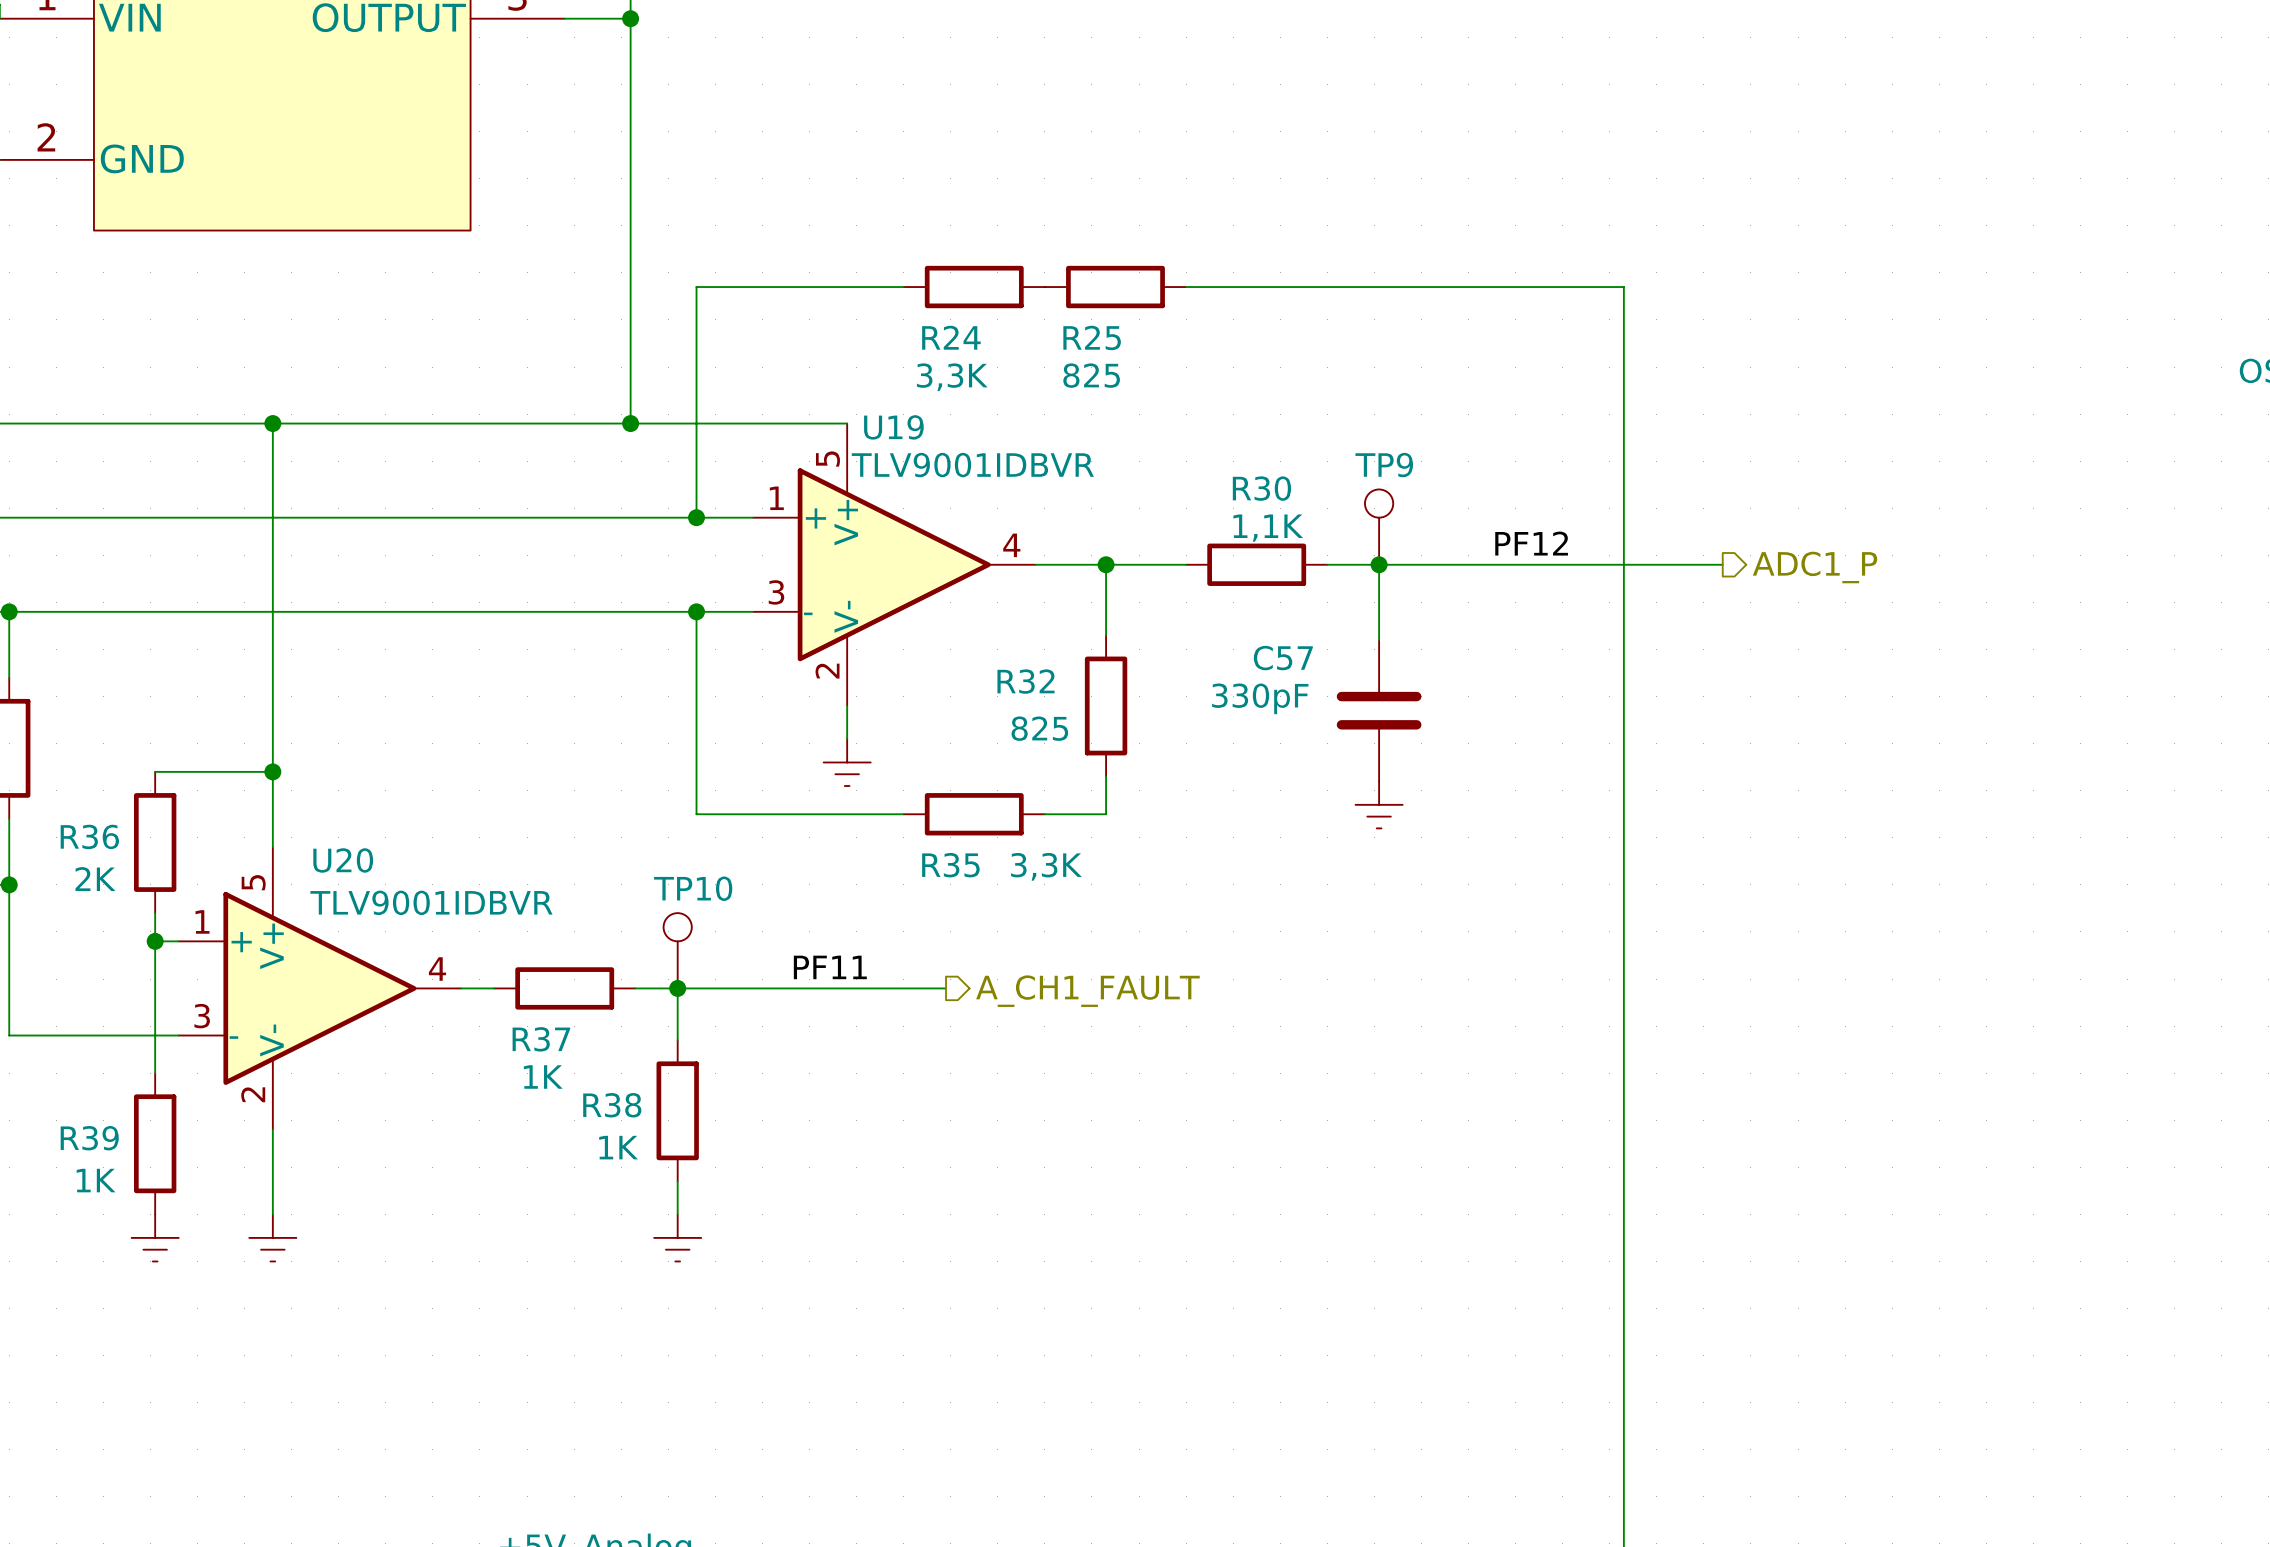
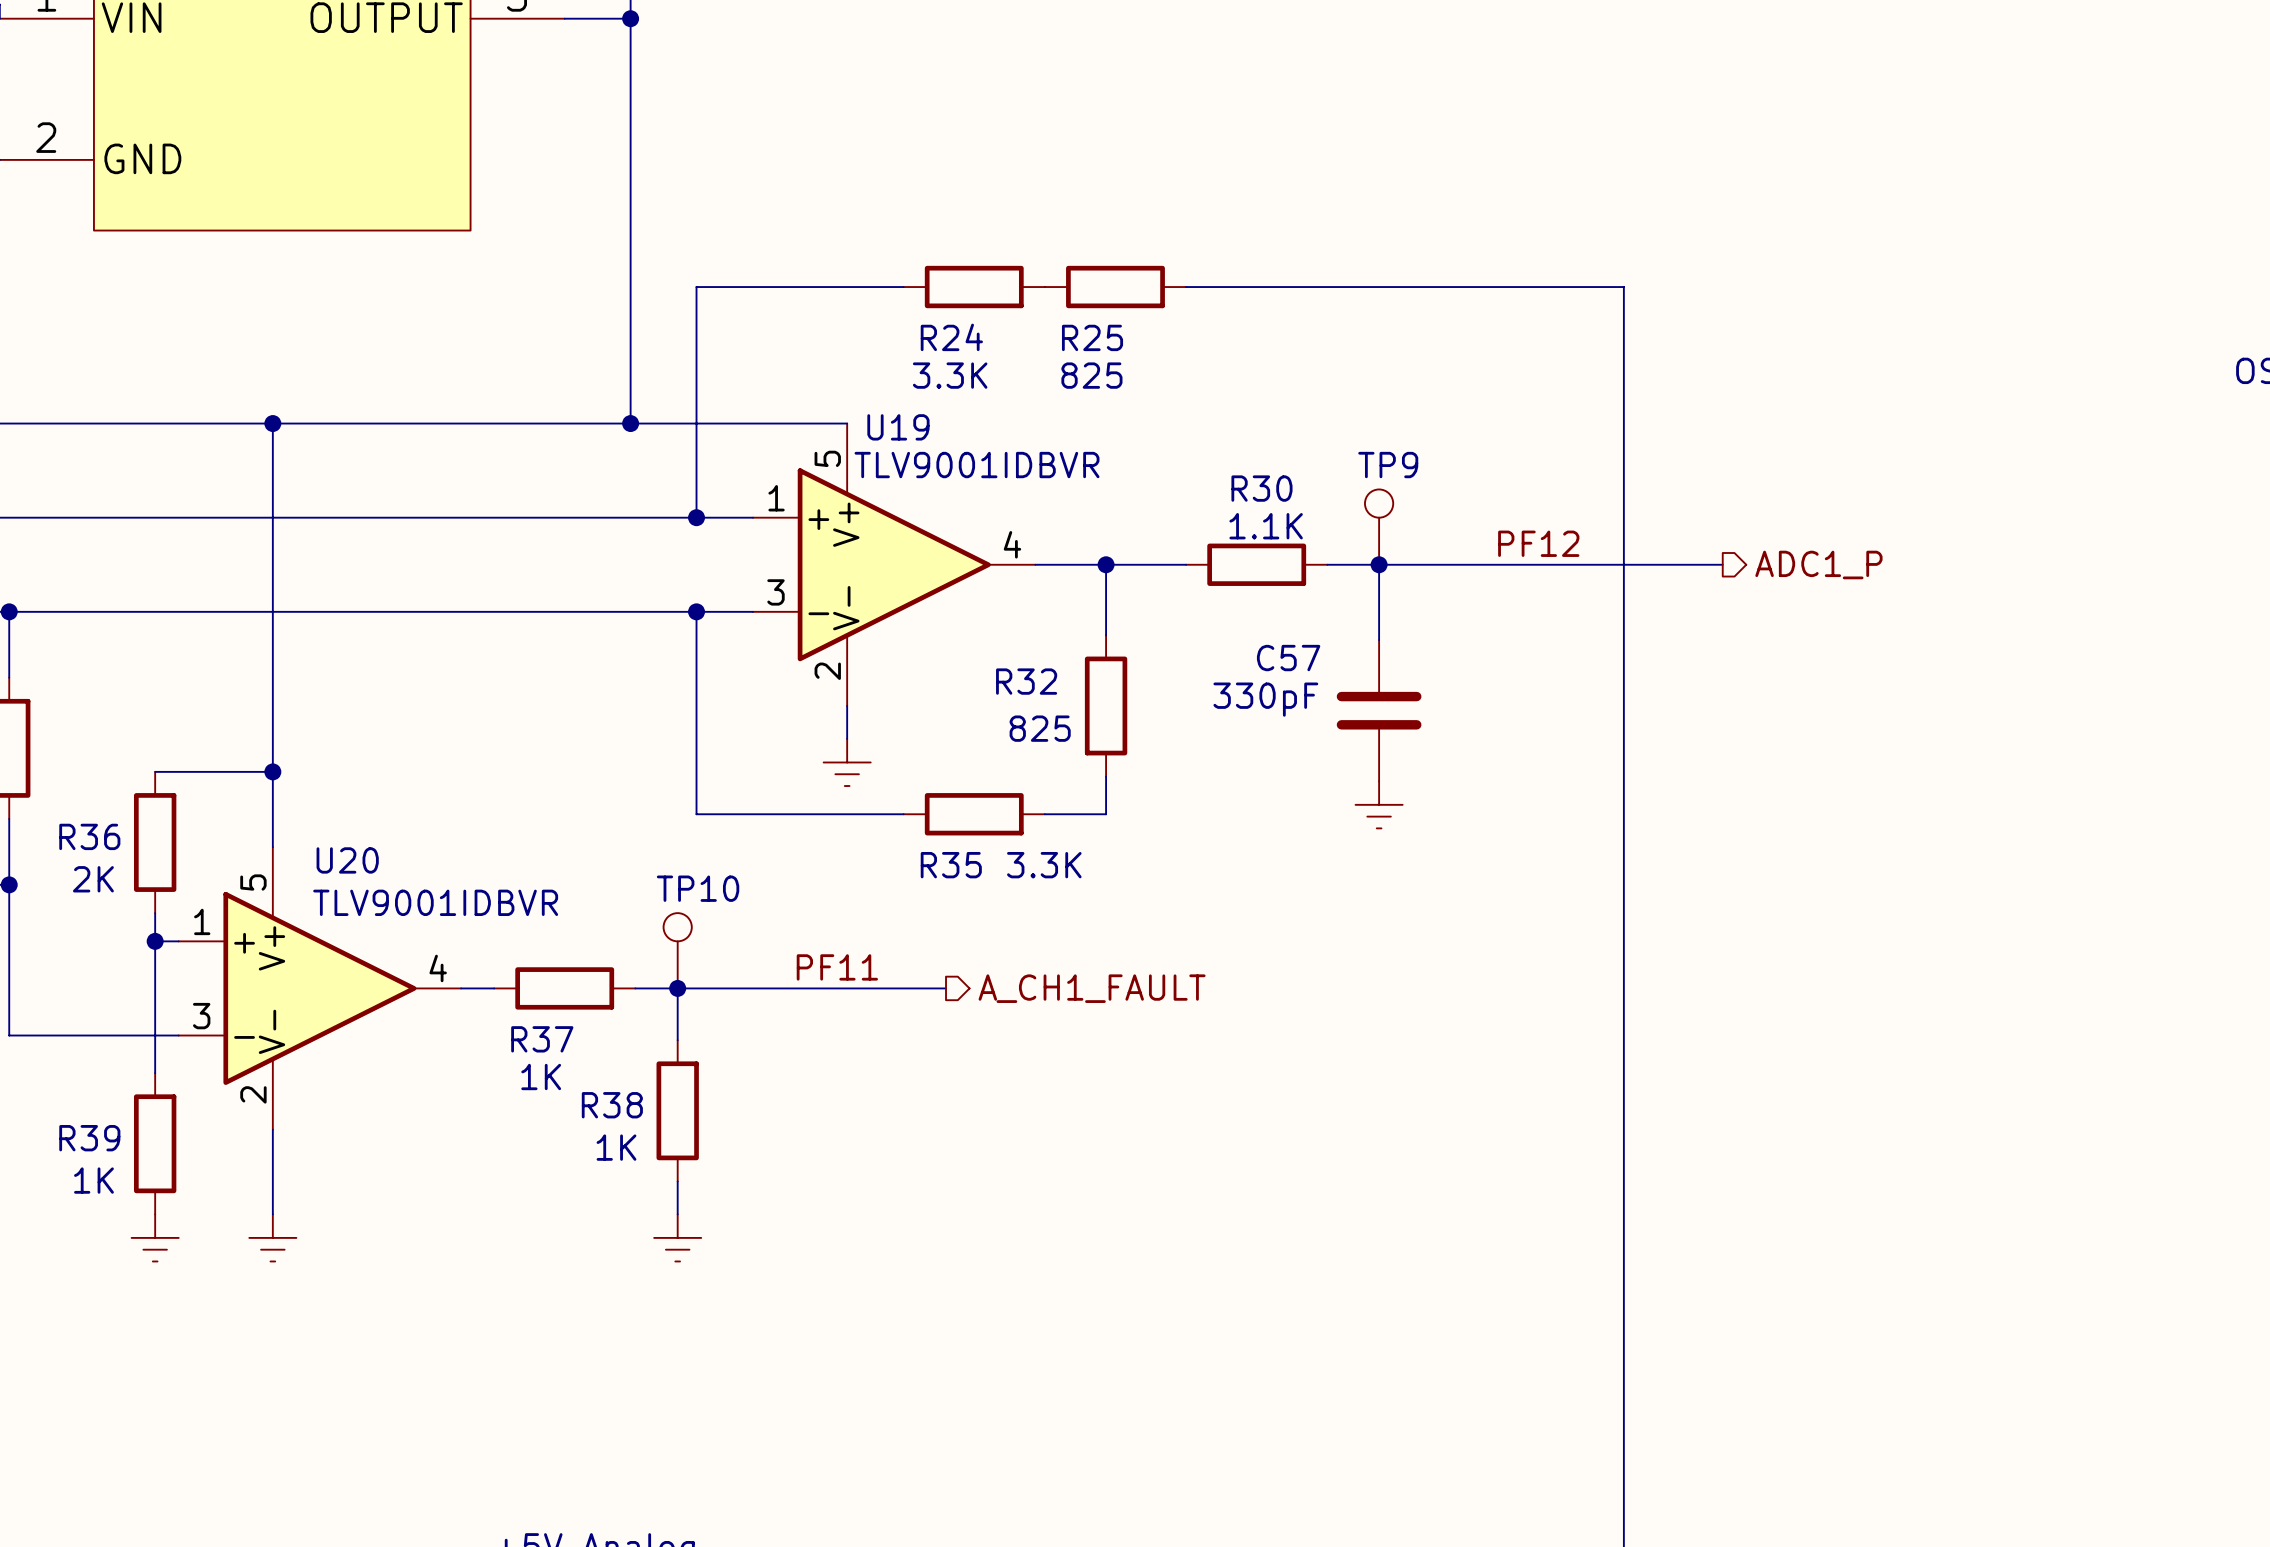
R24 value: 3,3K (952, 377) -> 3.3K (950, 375)
R30 value: 1,1K (1268, 528) -> 1.1K (1266, 526)
R35 value: 3,3K (1046, 866) -> 3.3K (1044, 865)

